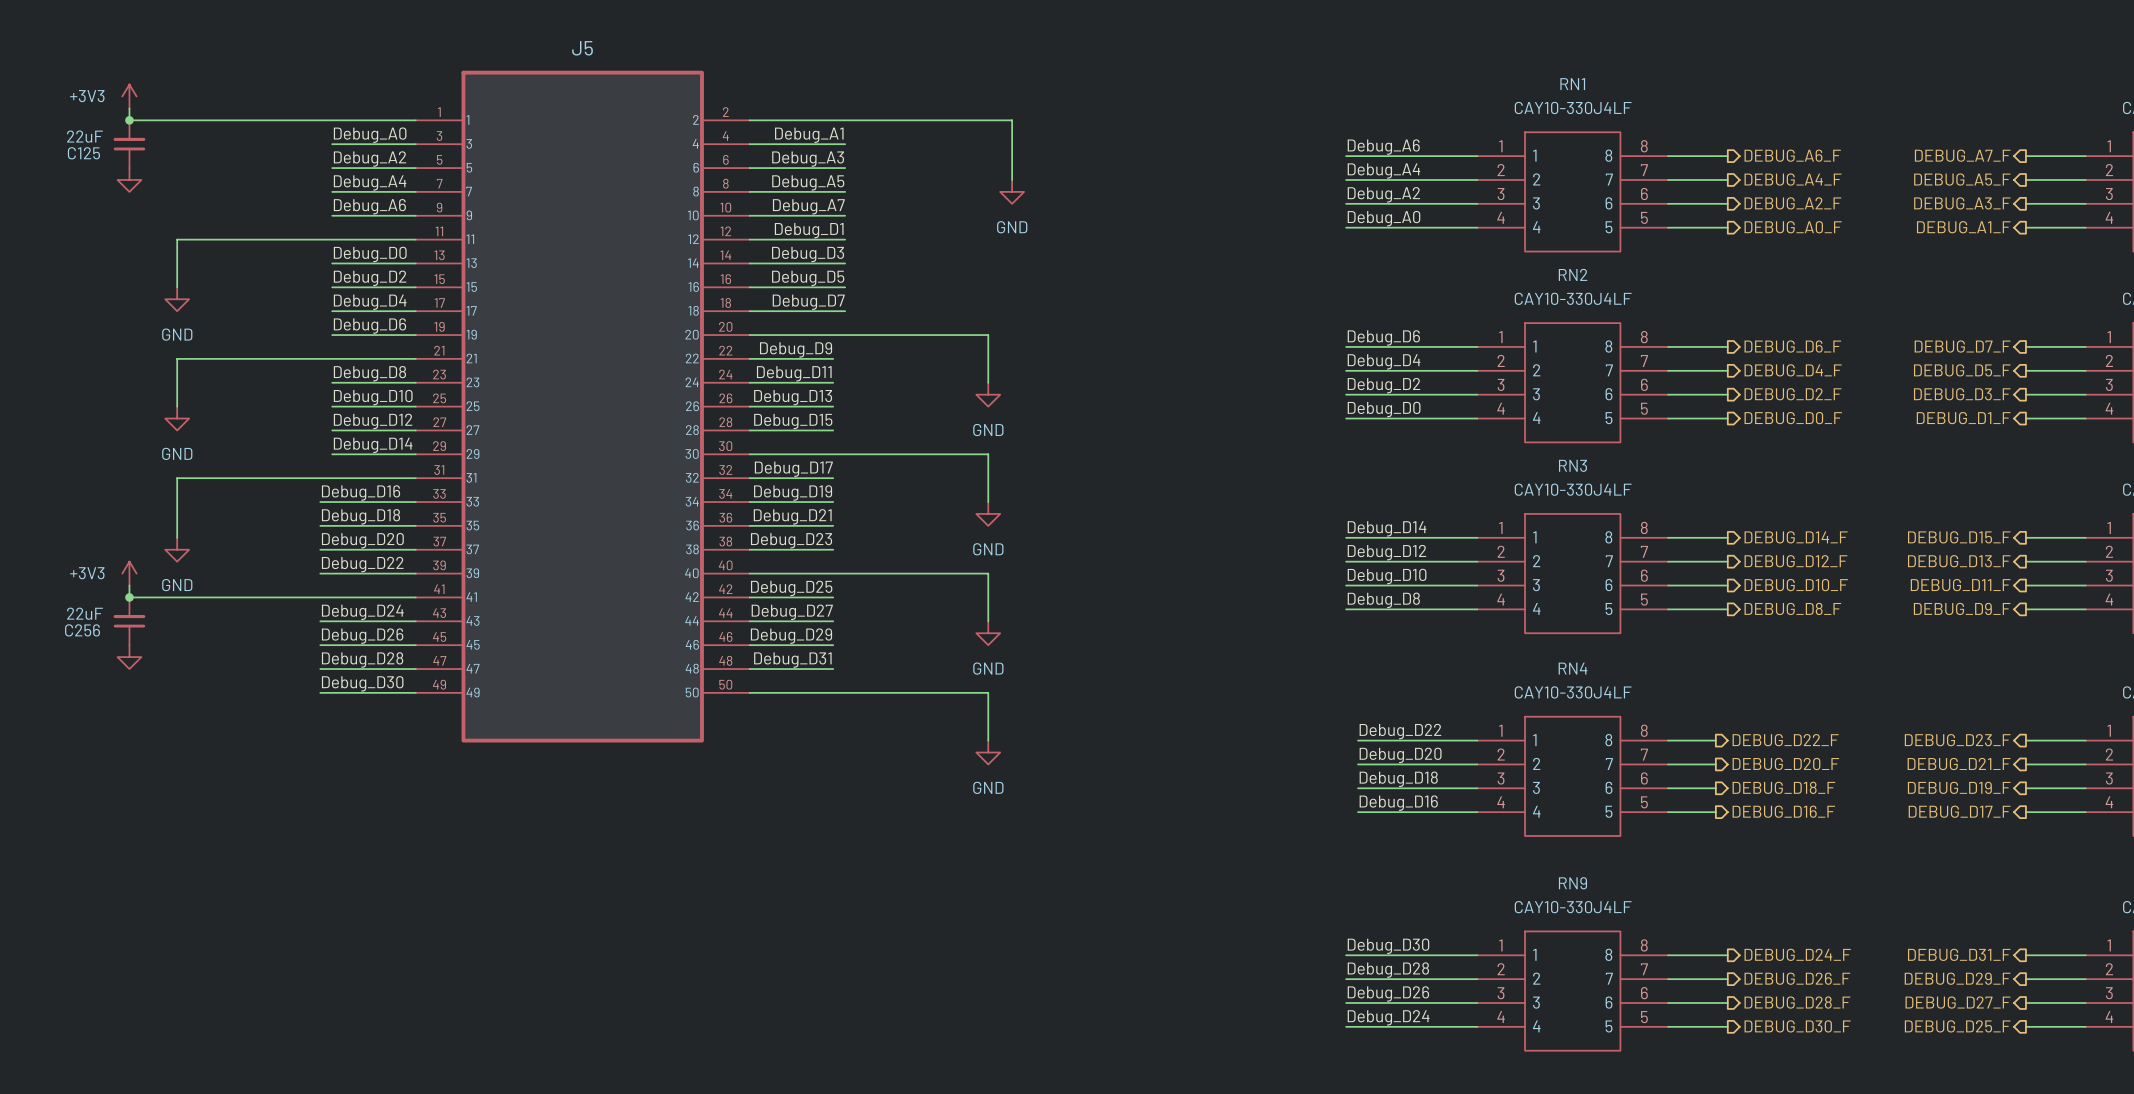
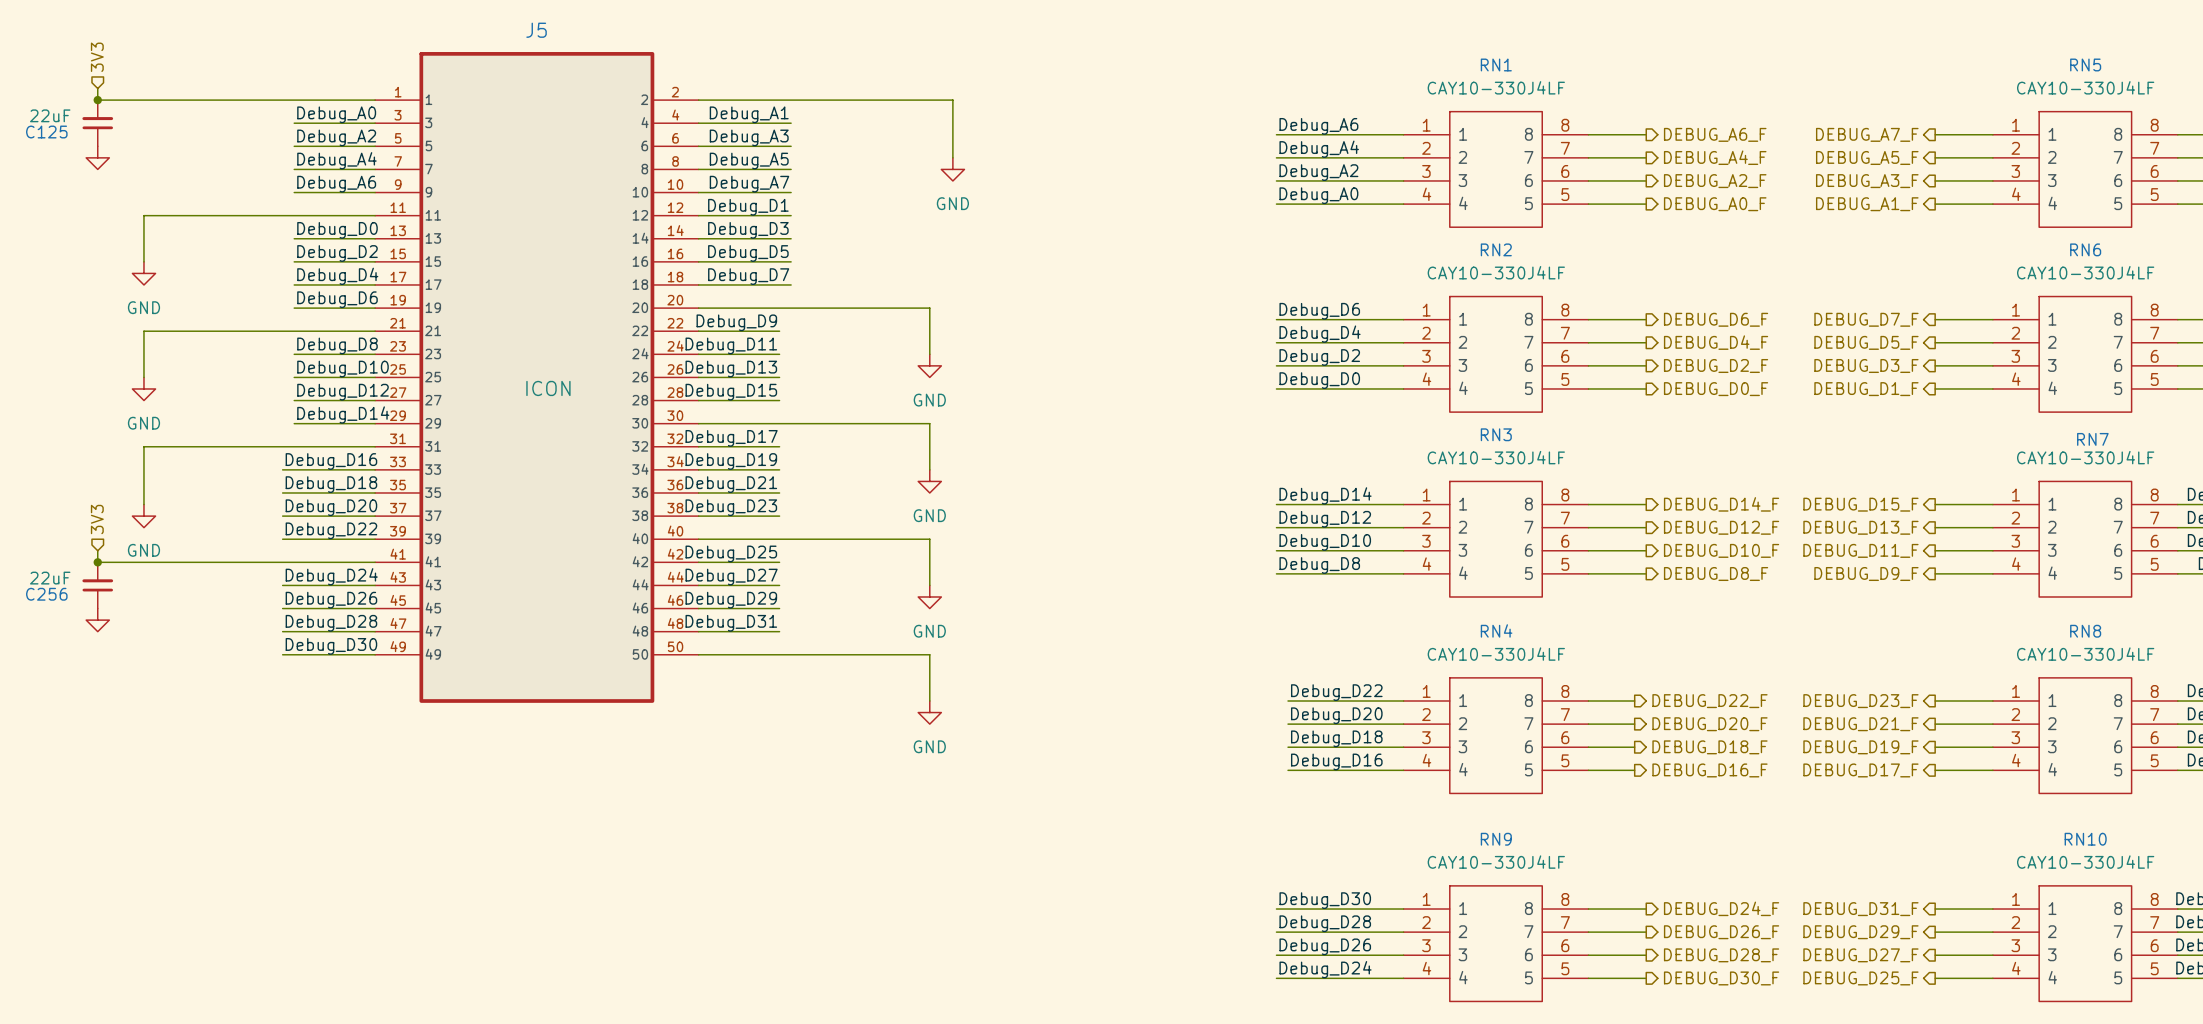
hierarchical label: none -> 3V3 (97, 57)
power symbol: +3V3 (129, 96) -> none
J5 value: none -> ICON (548, 388)
hierarchical label: none -> 3V3 (97, 519)
power symbol: +3V3 (129, 573) -> none

